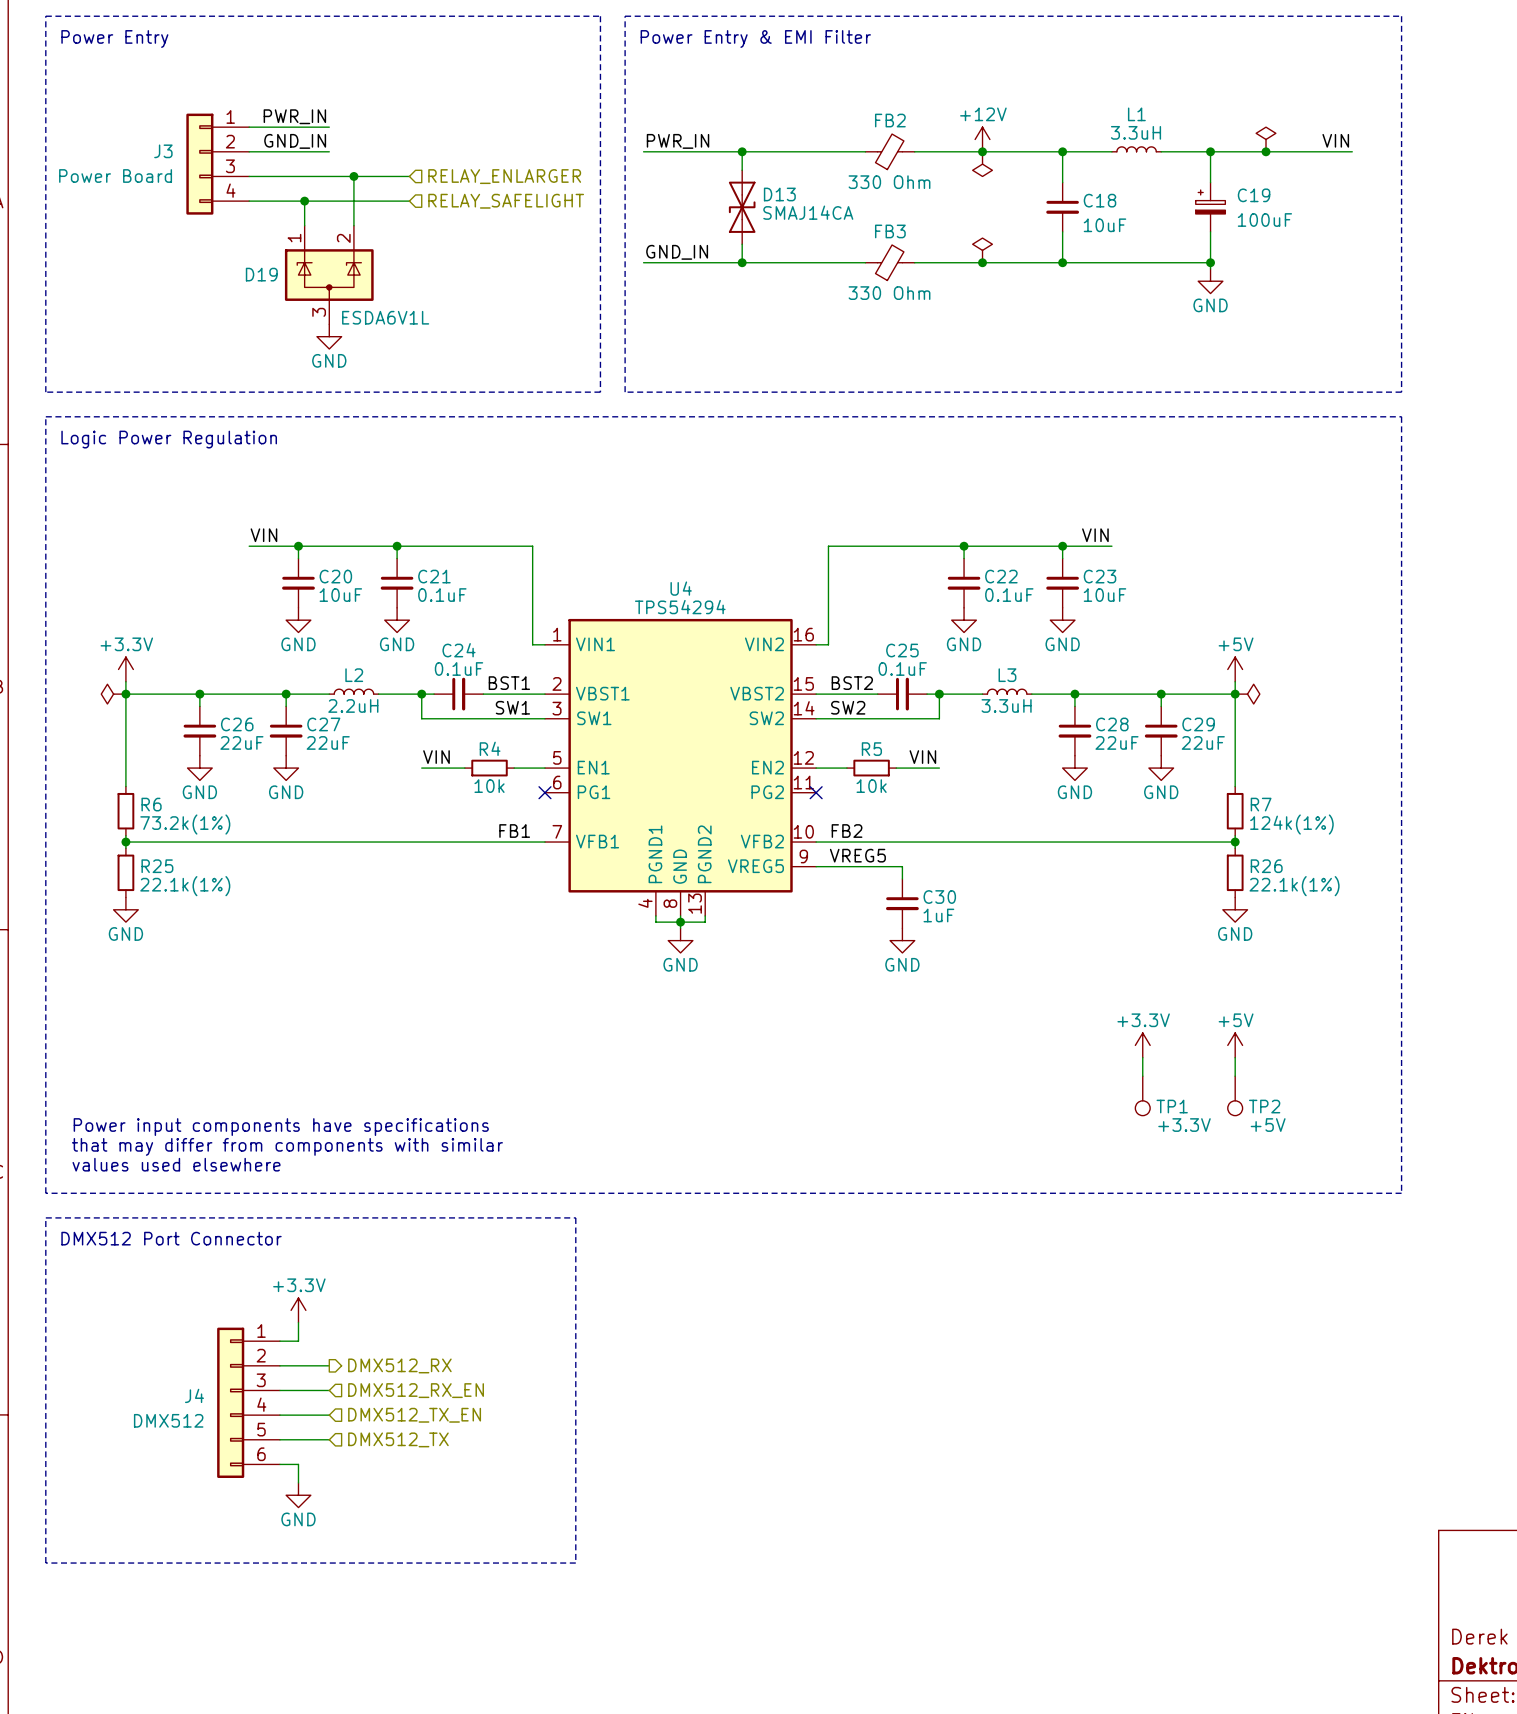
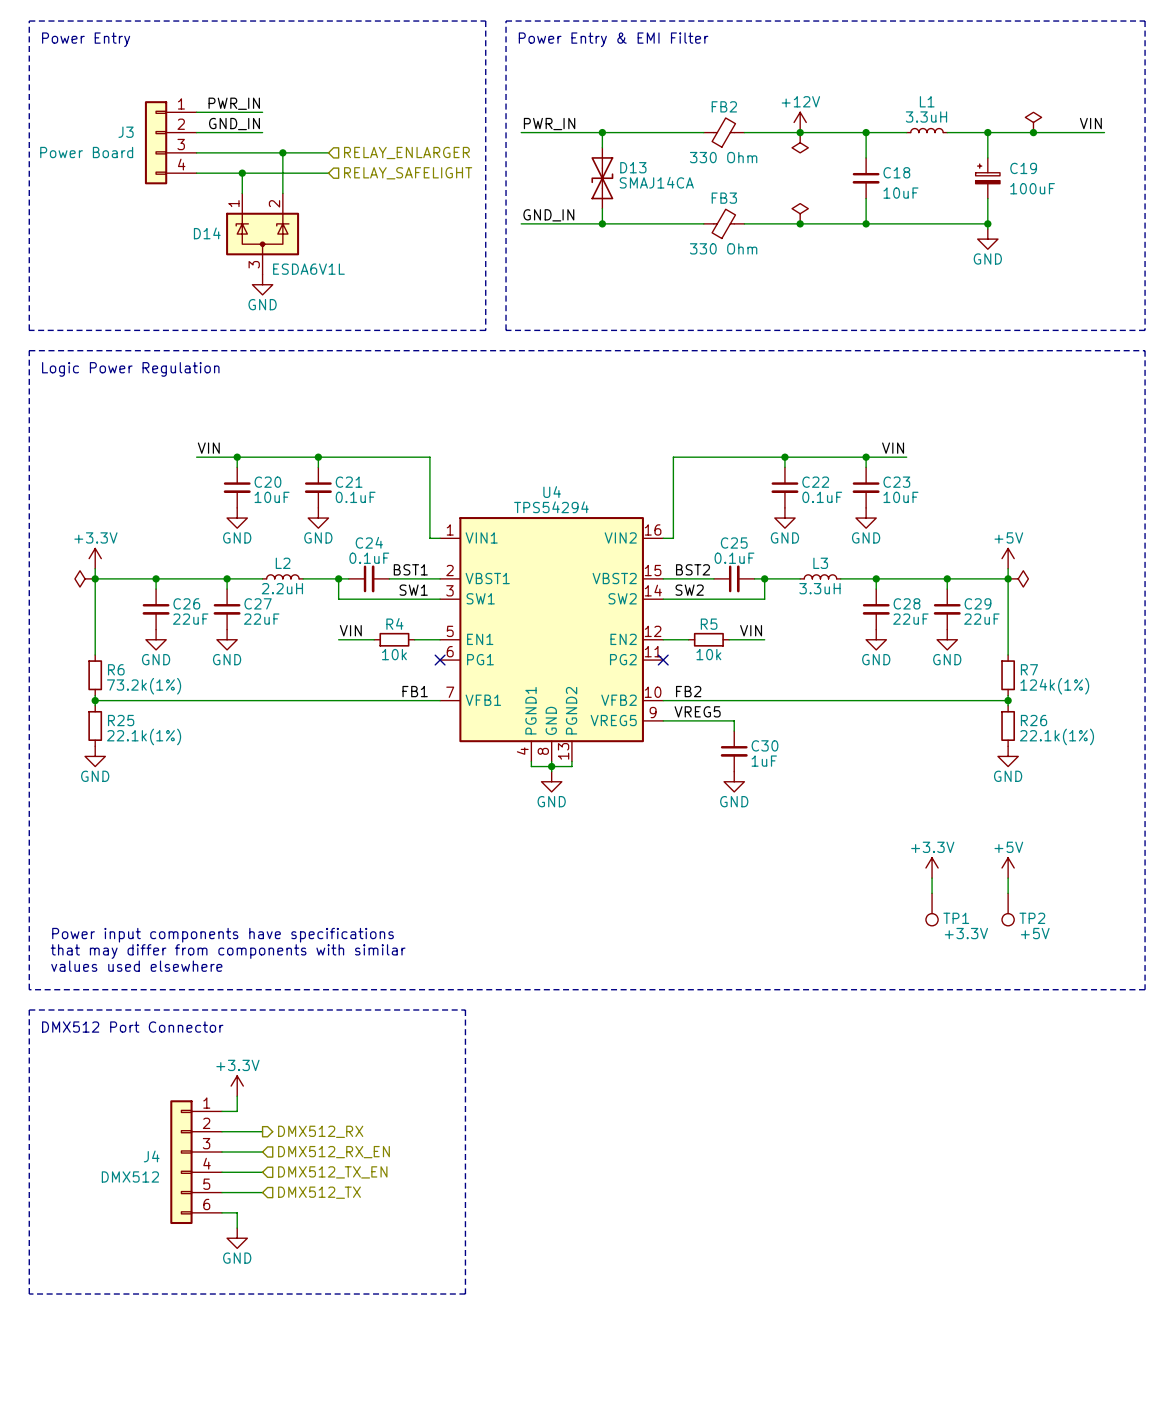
D19 name: D19 (261, 274) -> D14 (207, 233)

